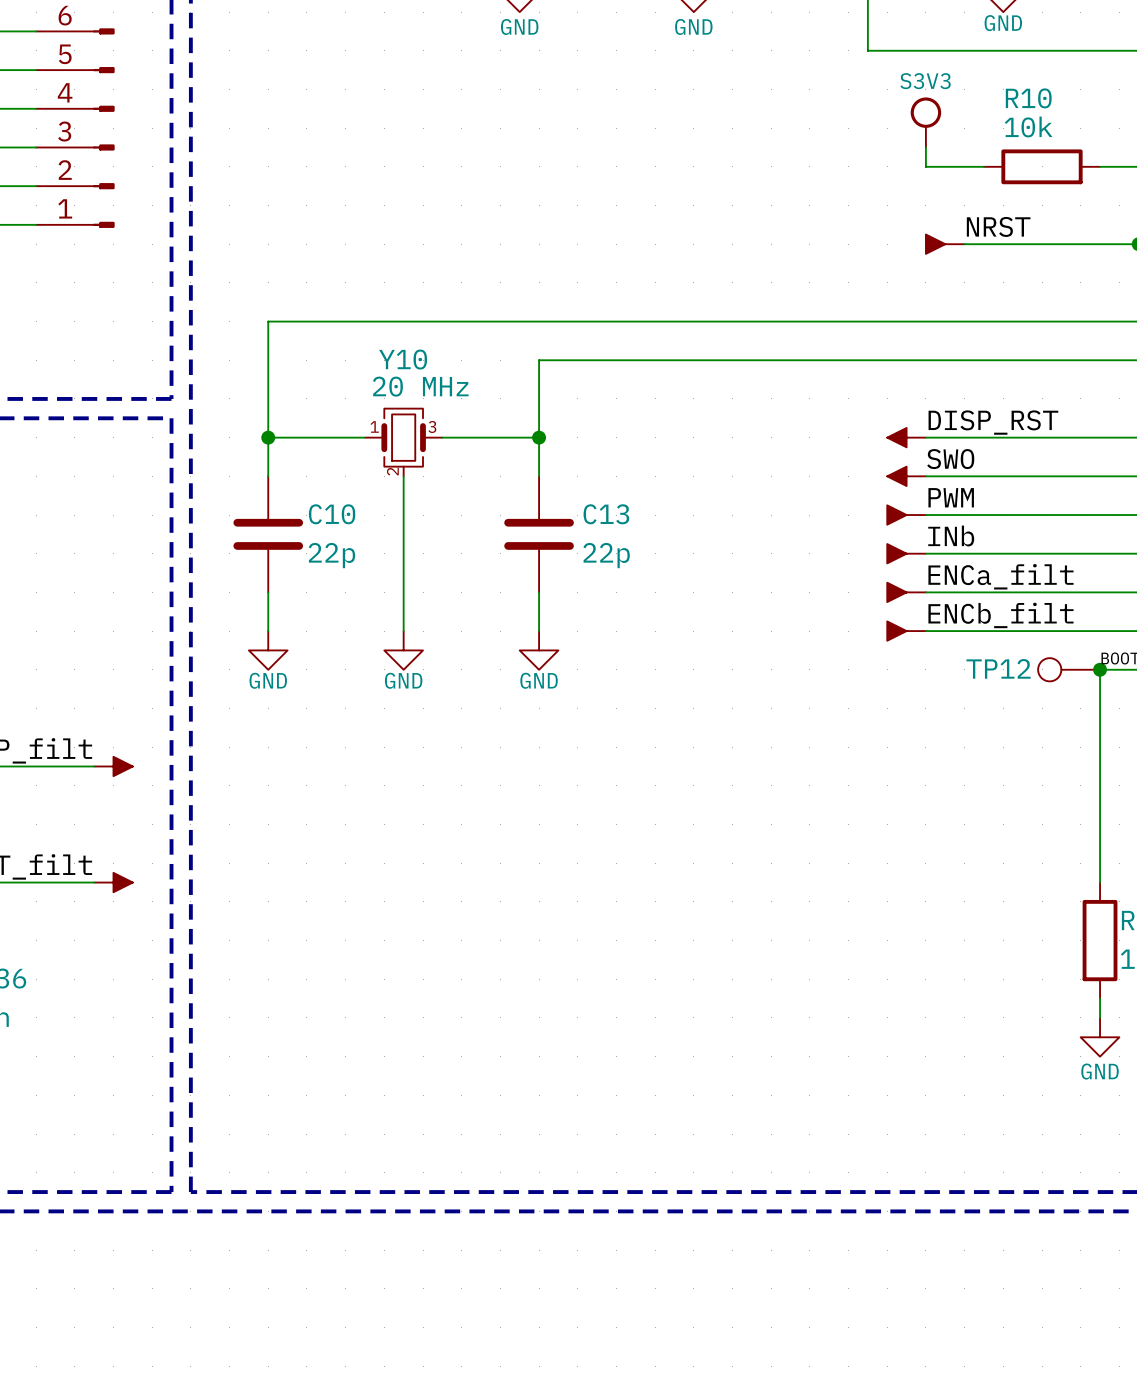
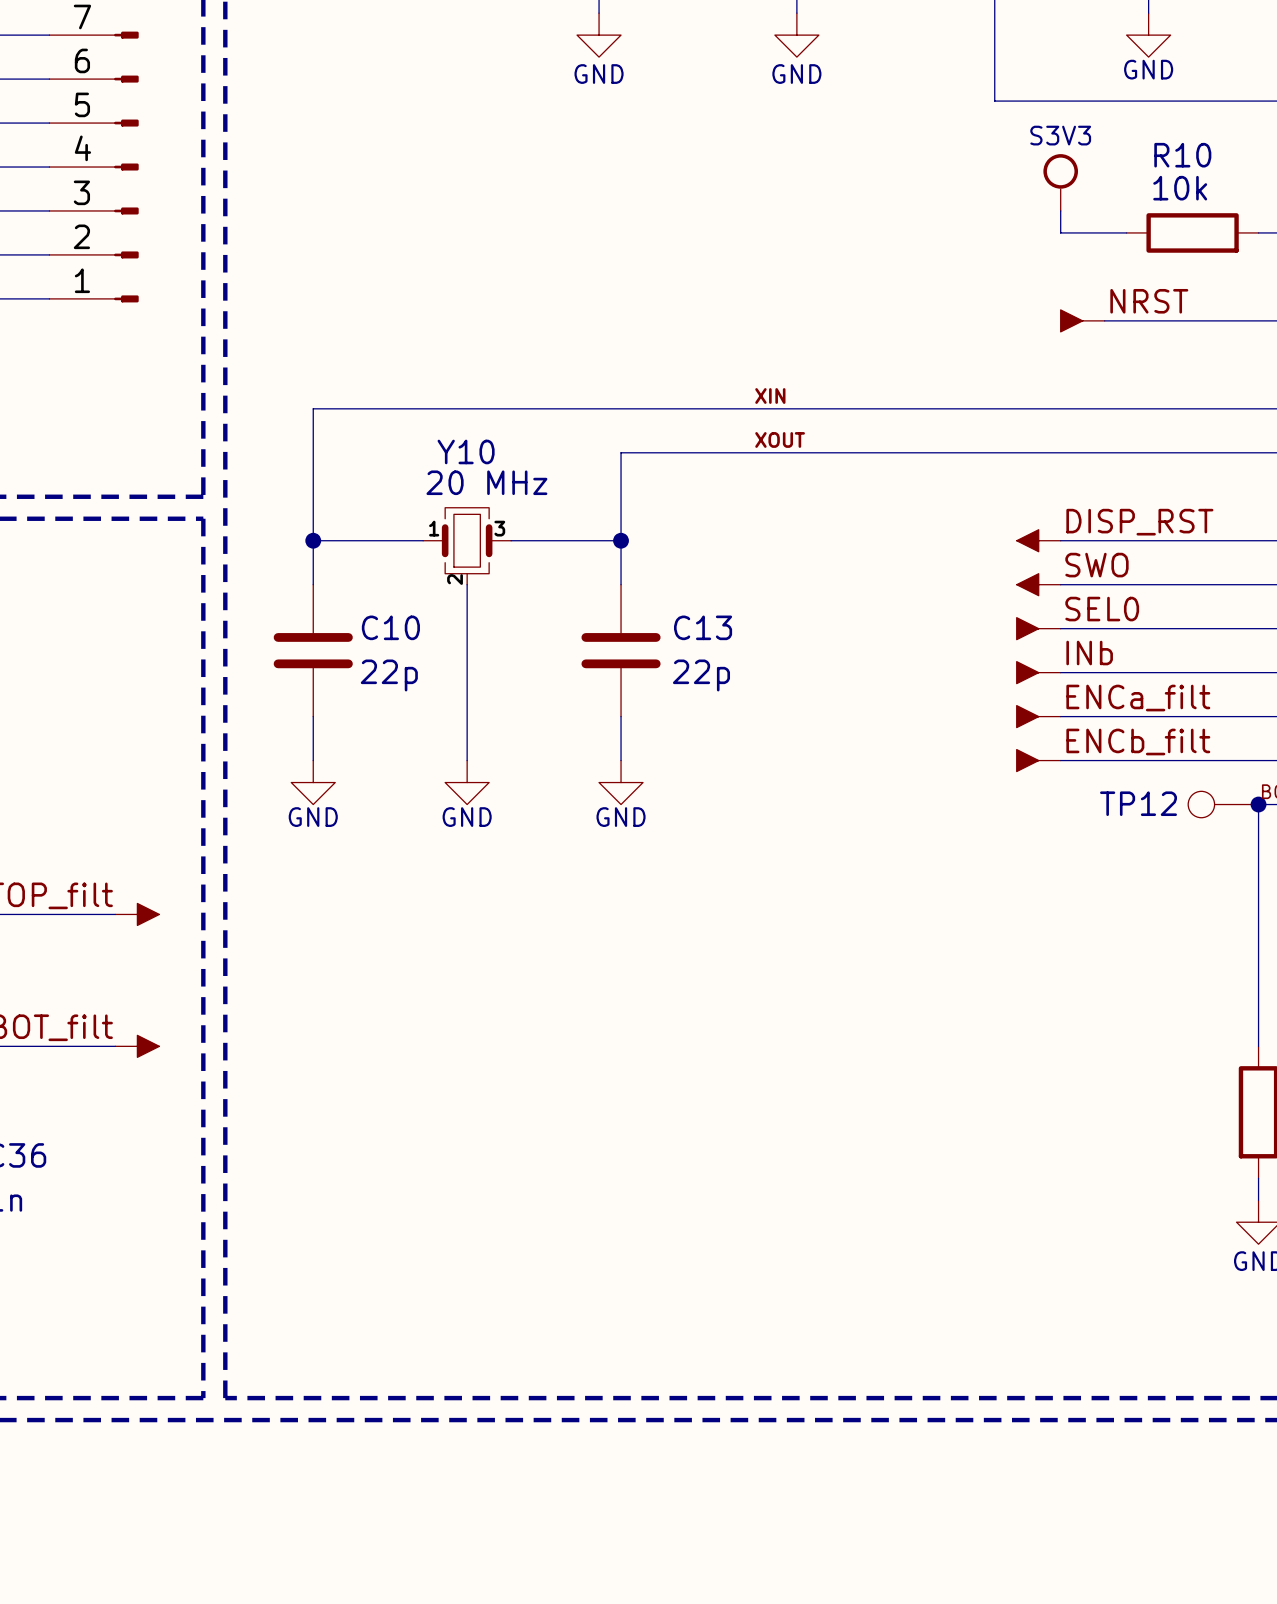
label: none -> XIN (770, 396)
label: none -> XOUT (780, 439)
label: PWM (951, 497) -> SEL0 (1102, 609)

